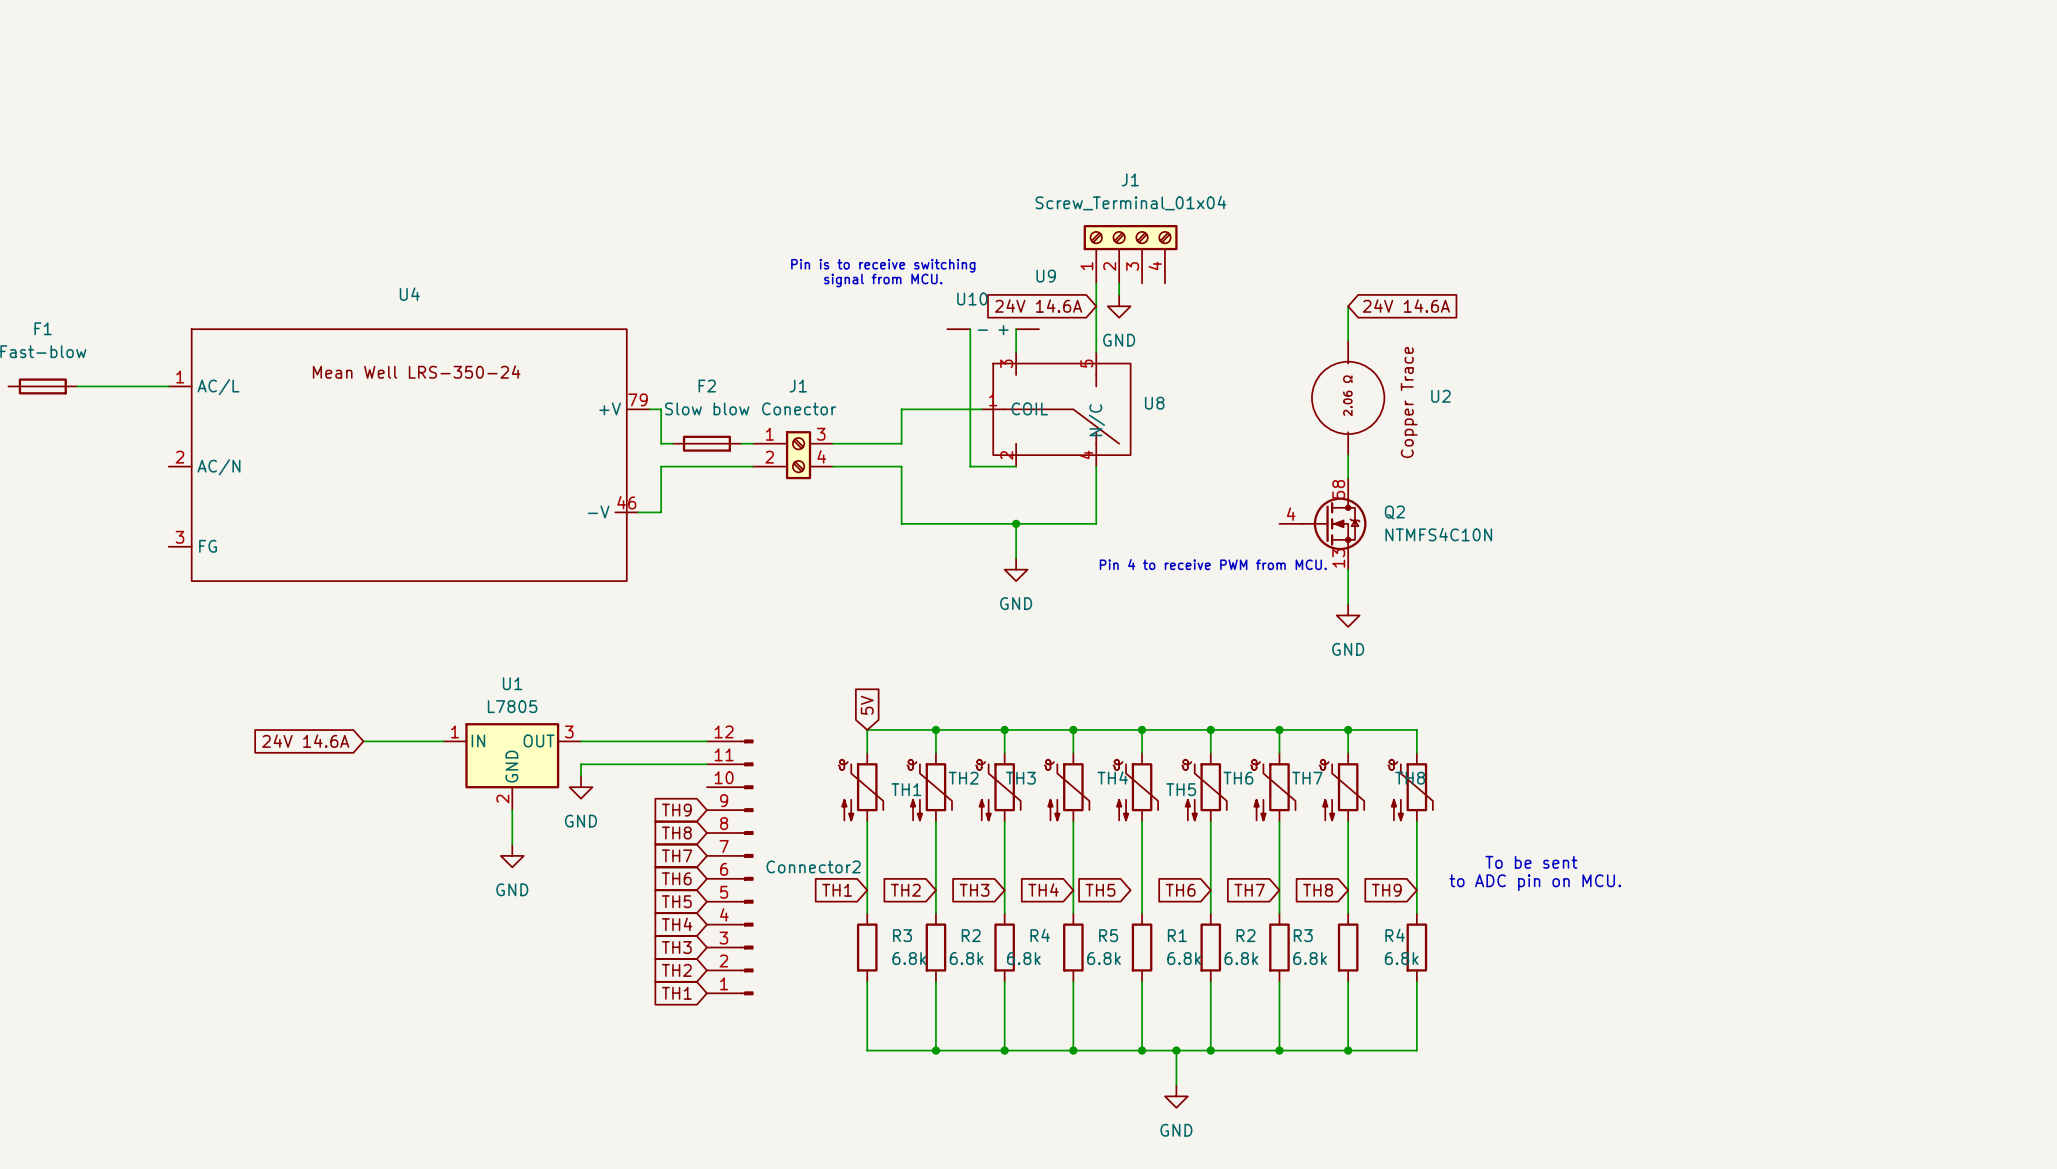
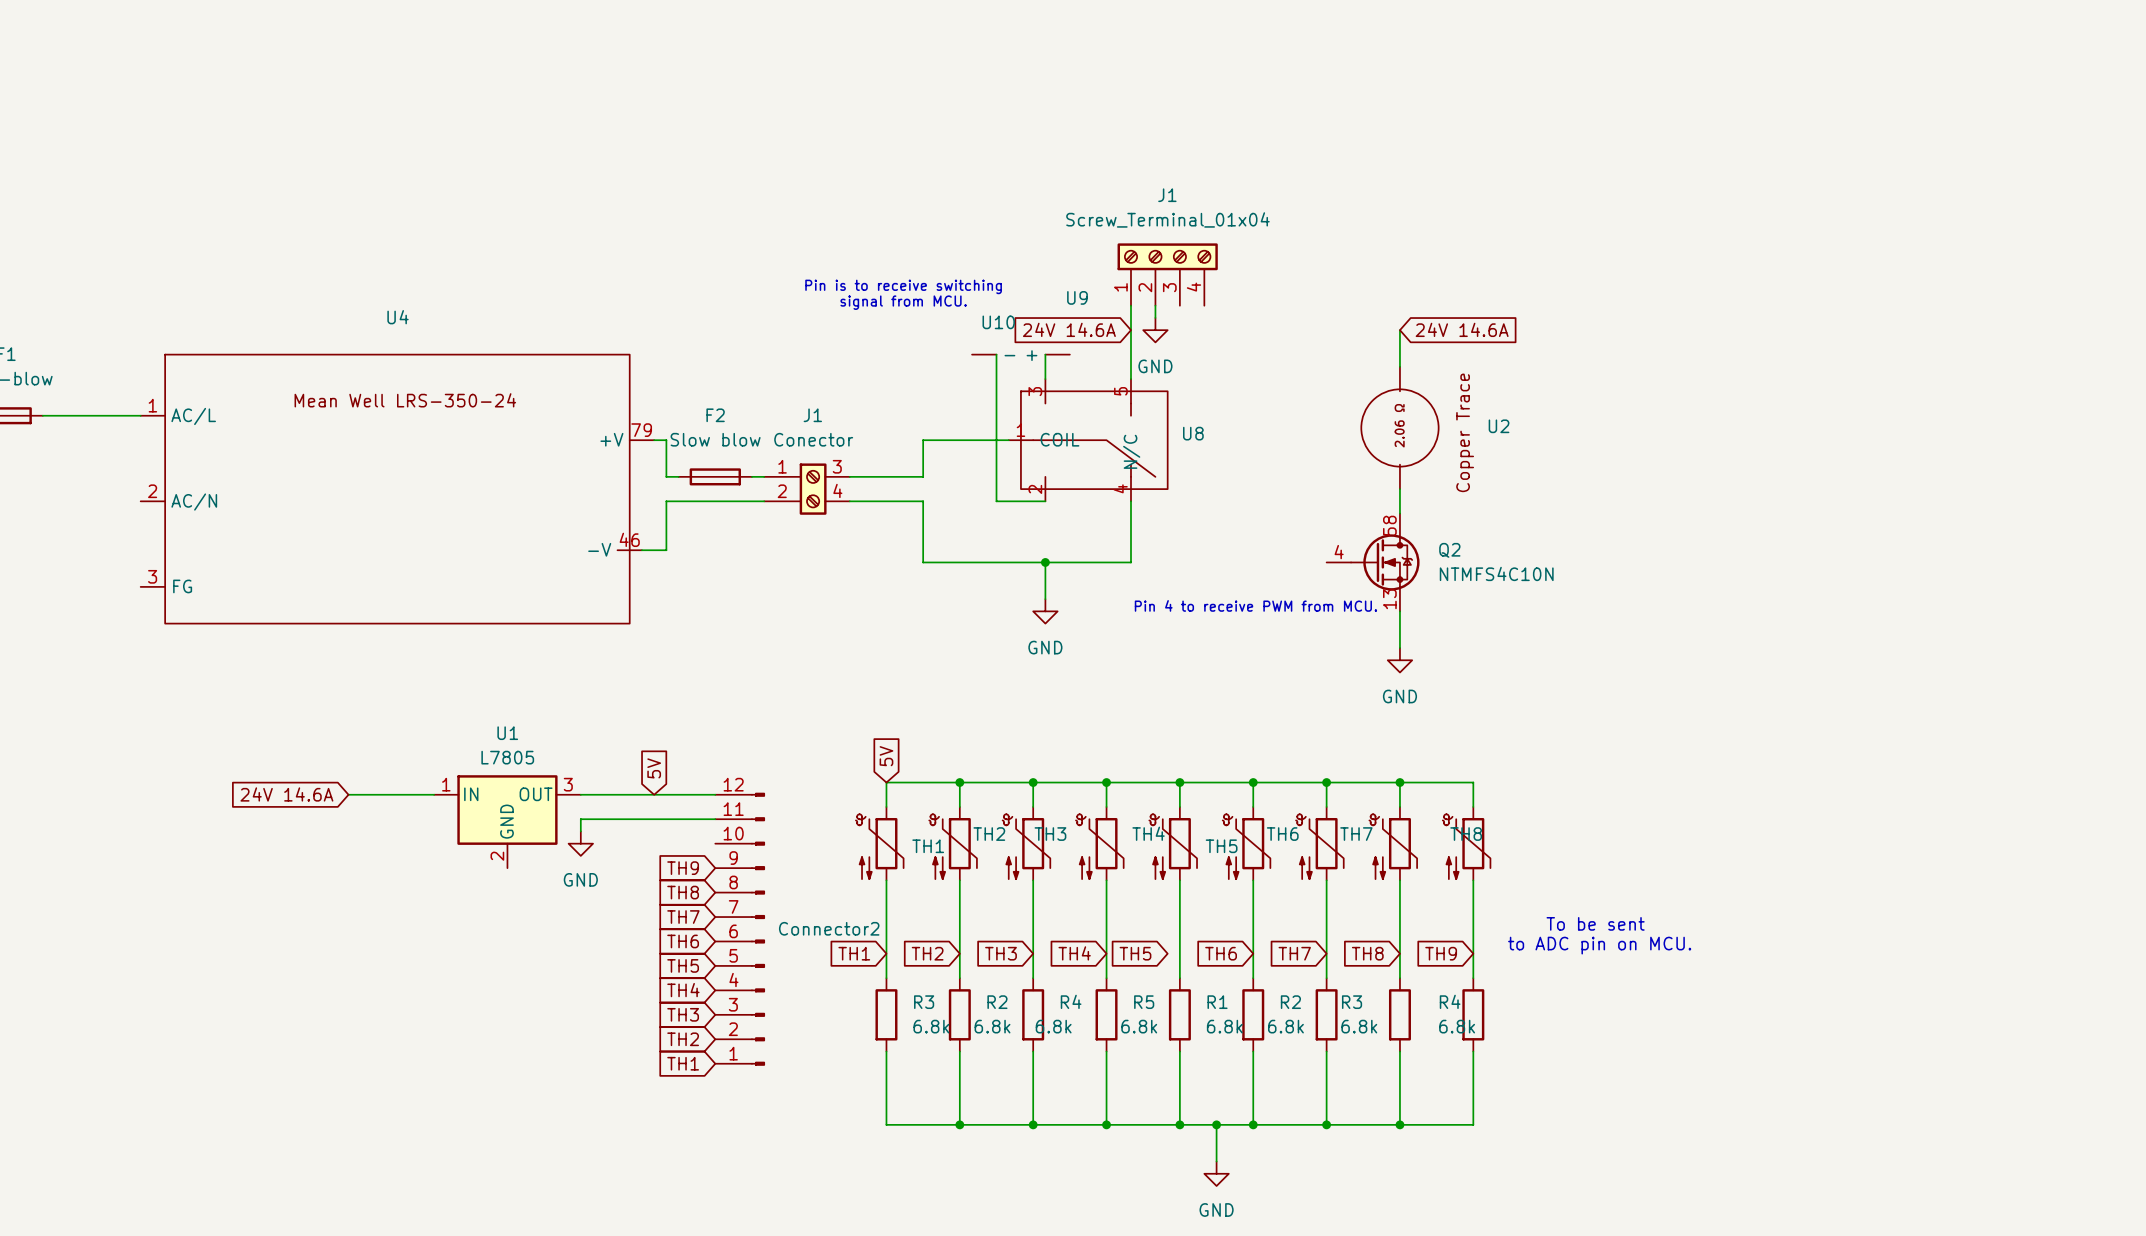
global label: none -> 5V (654, 768)
wire: (512, 810) (512, 844) -> none
power symbol: GND (512, 855) -> none

